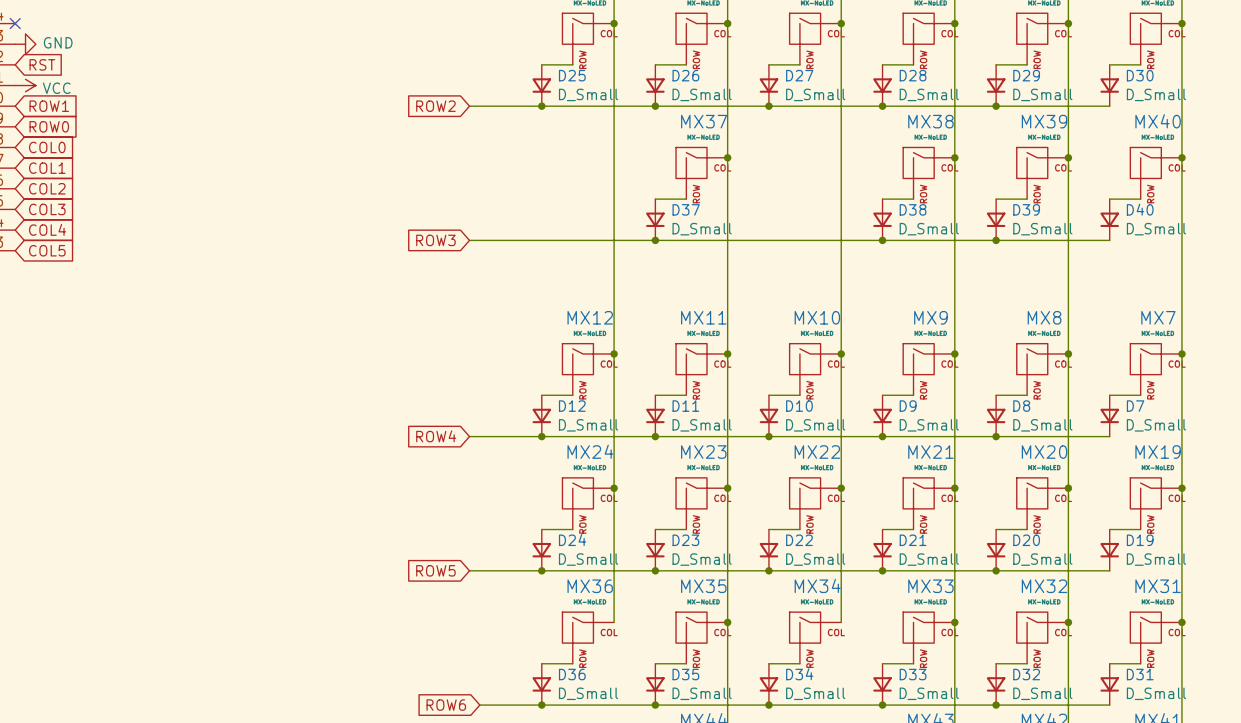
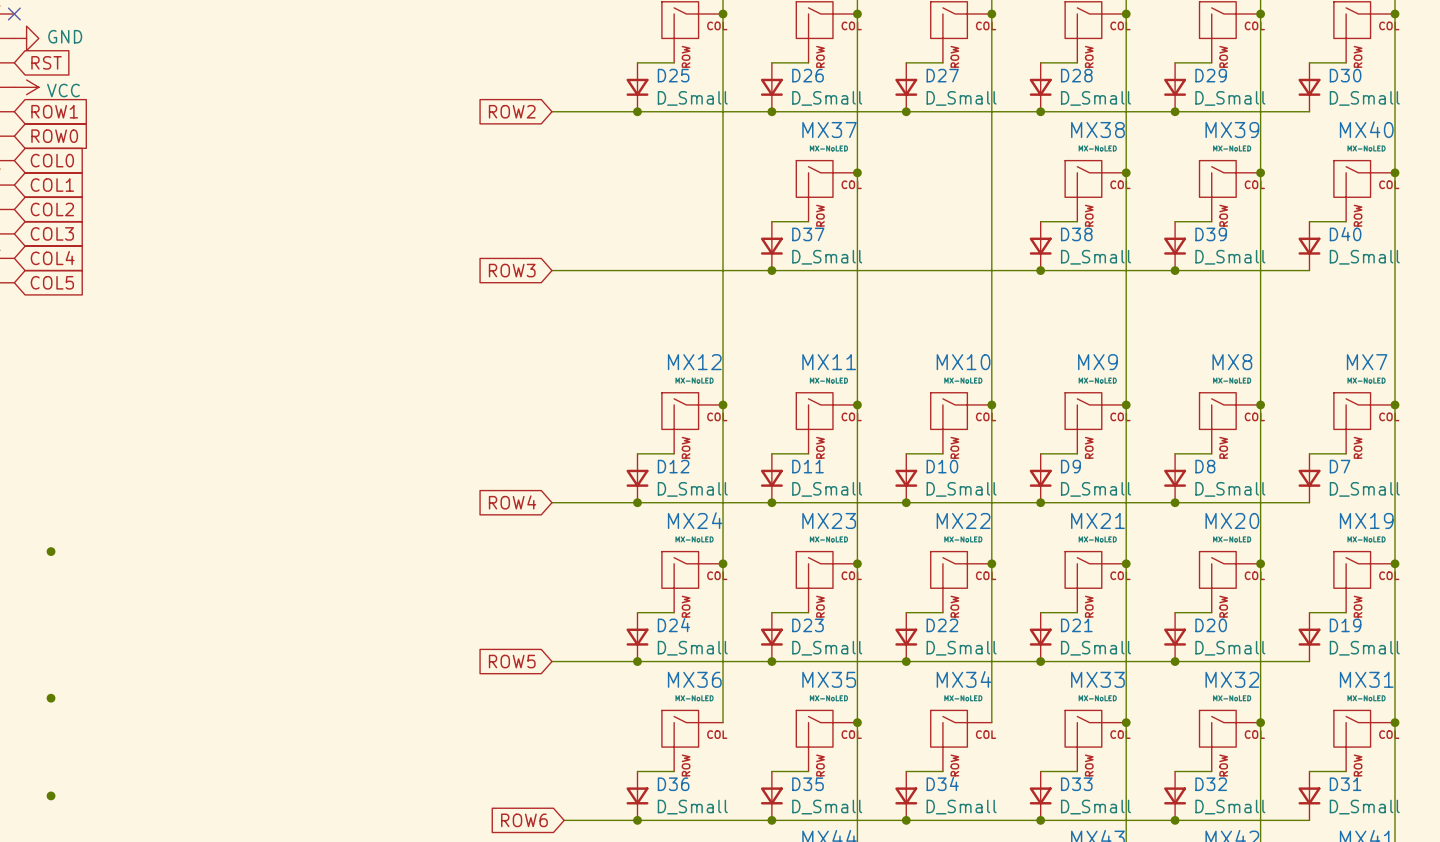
junction: none -> (51, 551)
junction: none -> (51, 698)
junction: none -> (51, 795)

